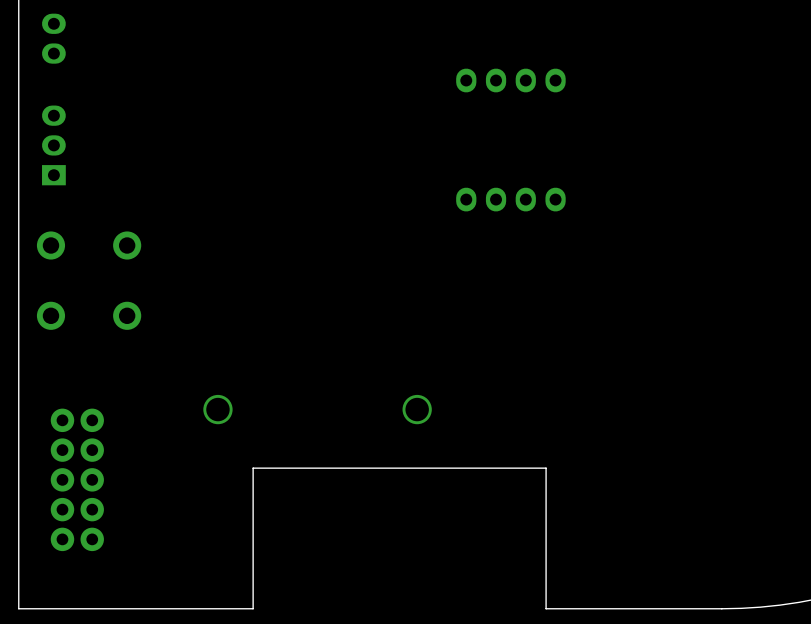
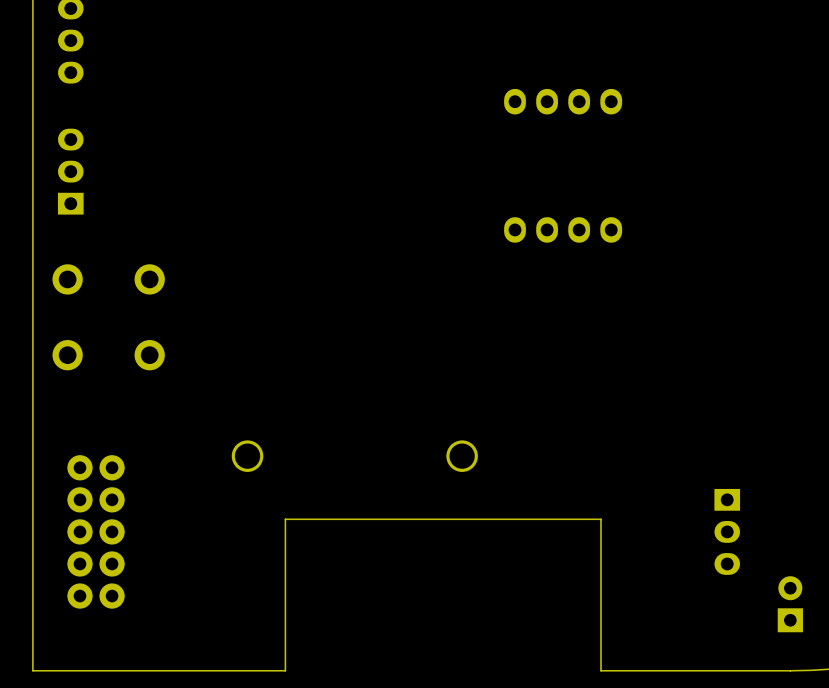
part: none -> (727, 531)
part: none -> (790, 604)

